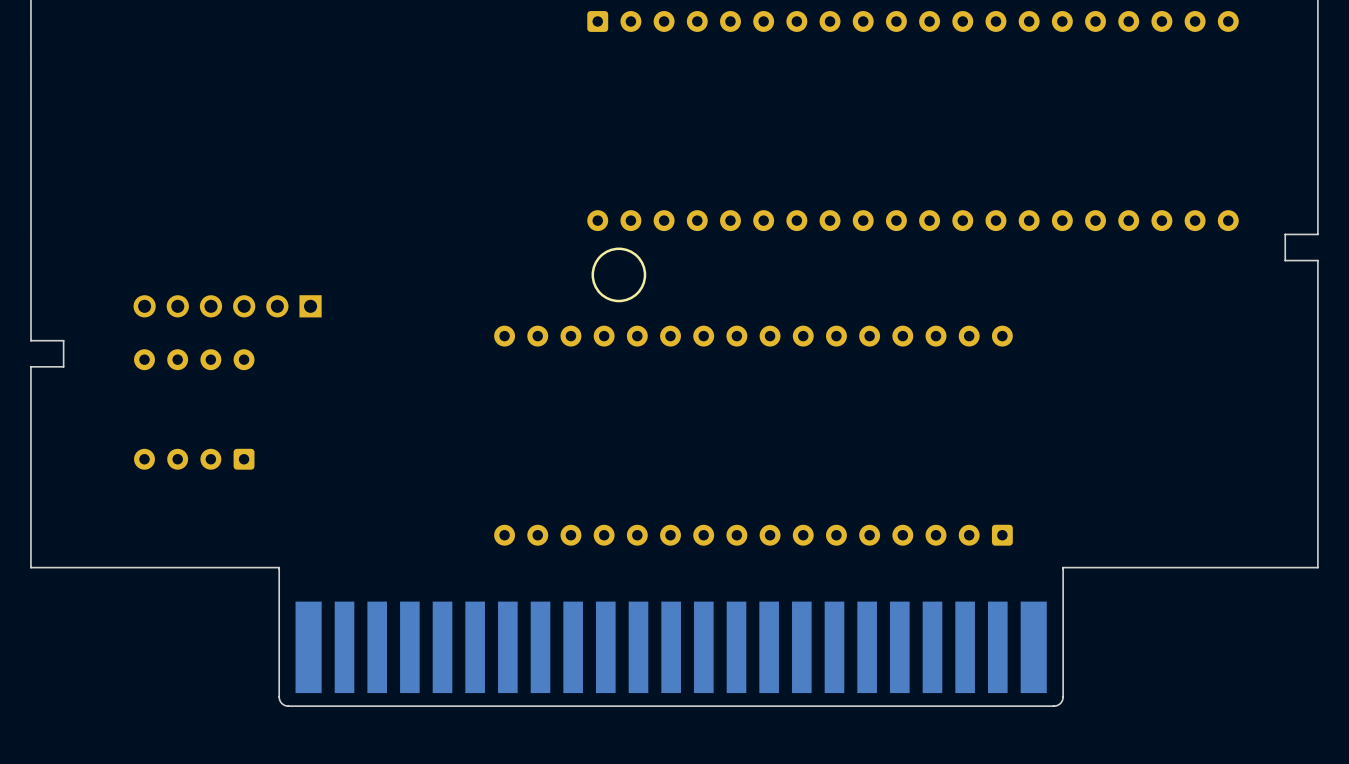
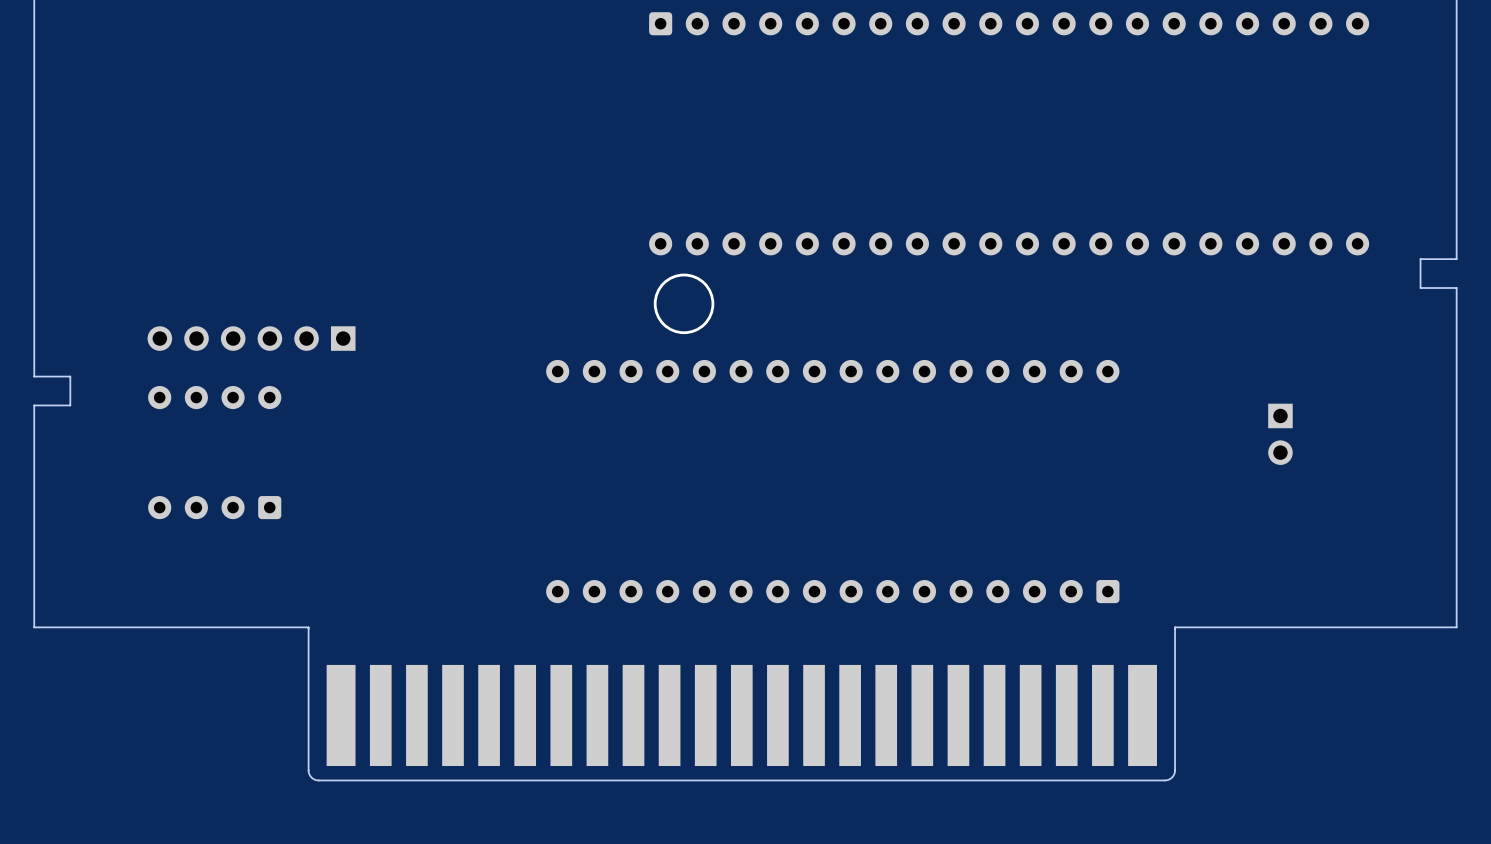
part: none -> (1280, 434)

